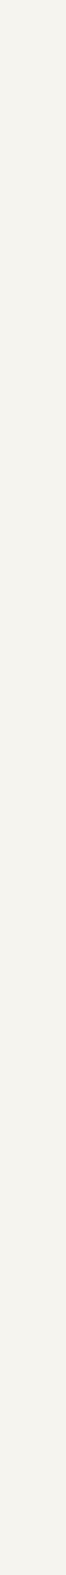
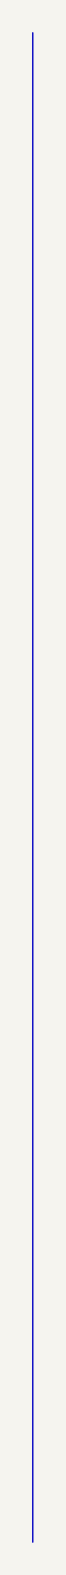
bus: none -> (32, 32) (32, 1542)

